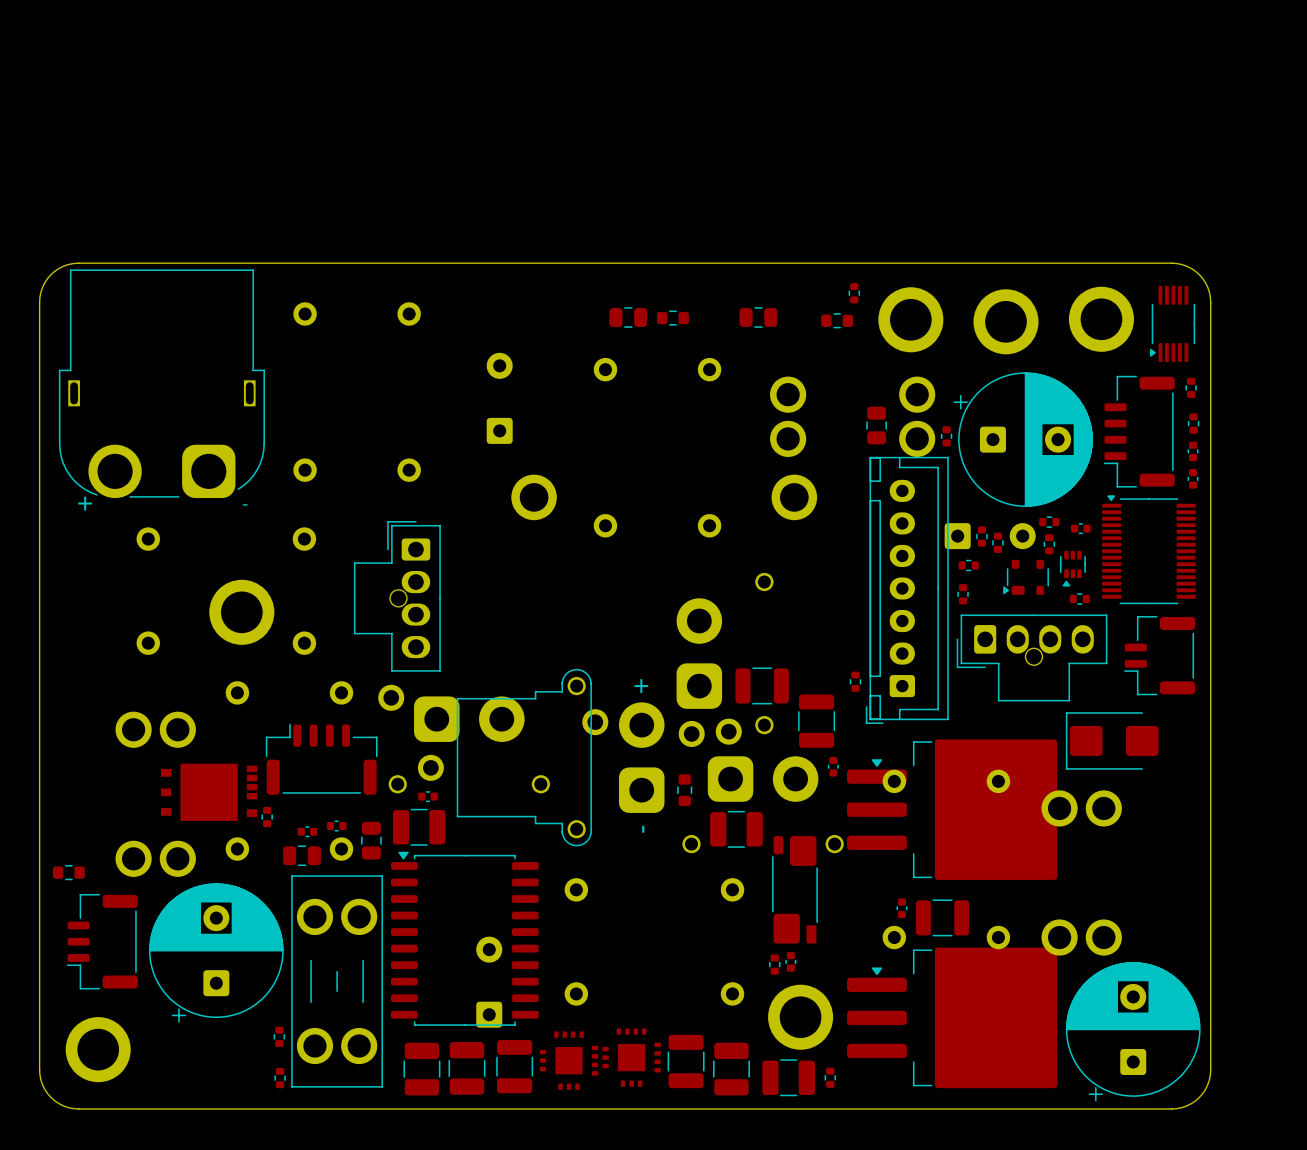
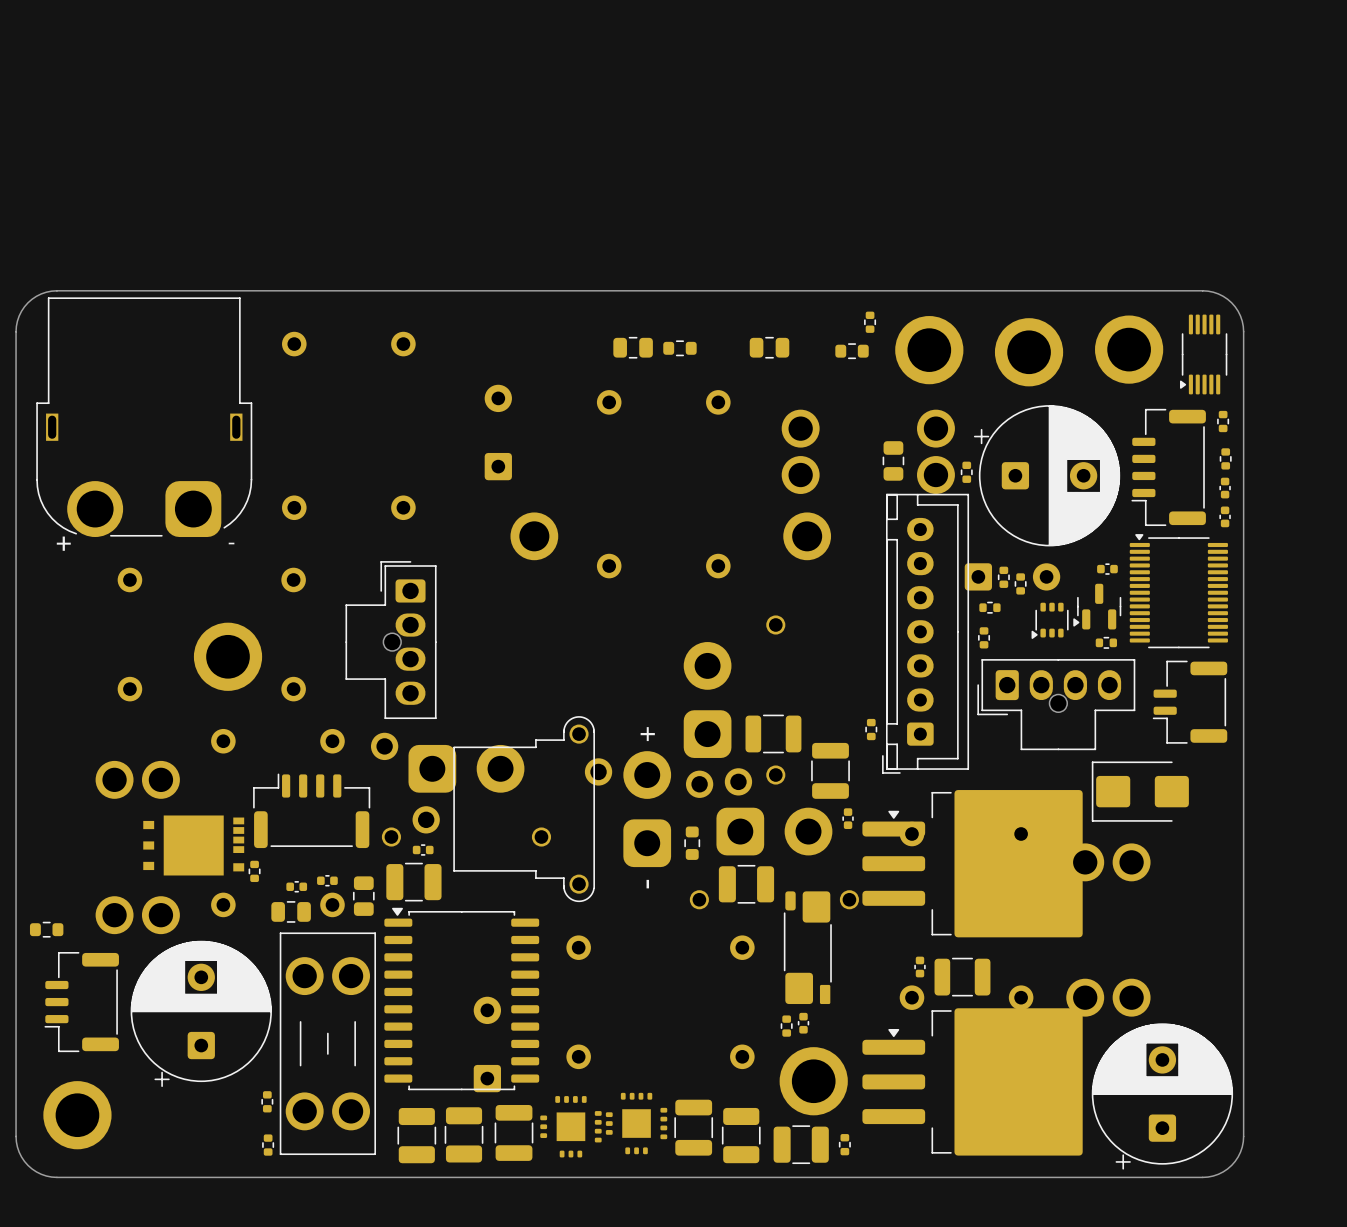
part: (1049, 522) -> none
part: (1049, 544) -> none
part footprint: [1059, 550, 1086, 587] -> [1073, 583, 1122, 630]
part footprint: [1003, 559, 1049, 595] -> [1031, 602, 1069, 639]

